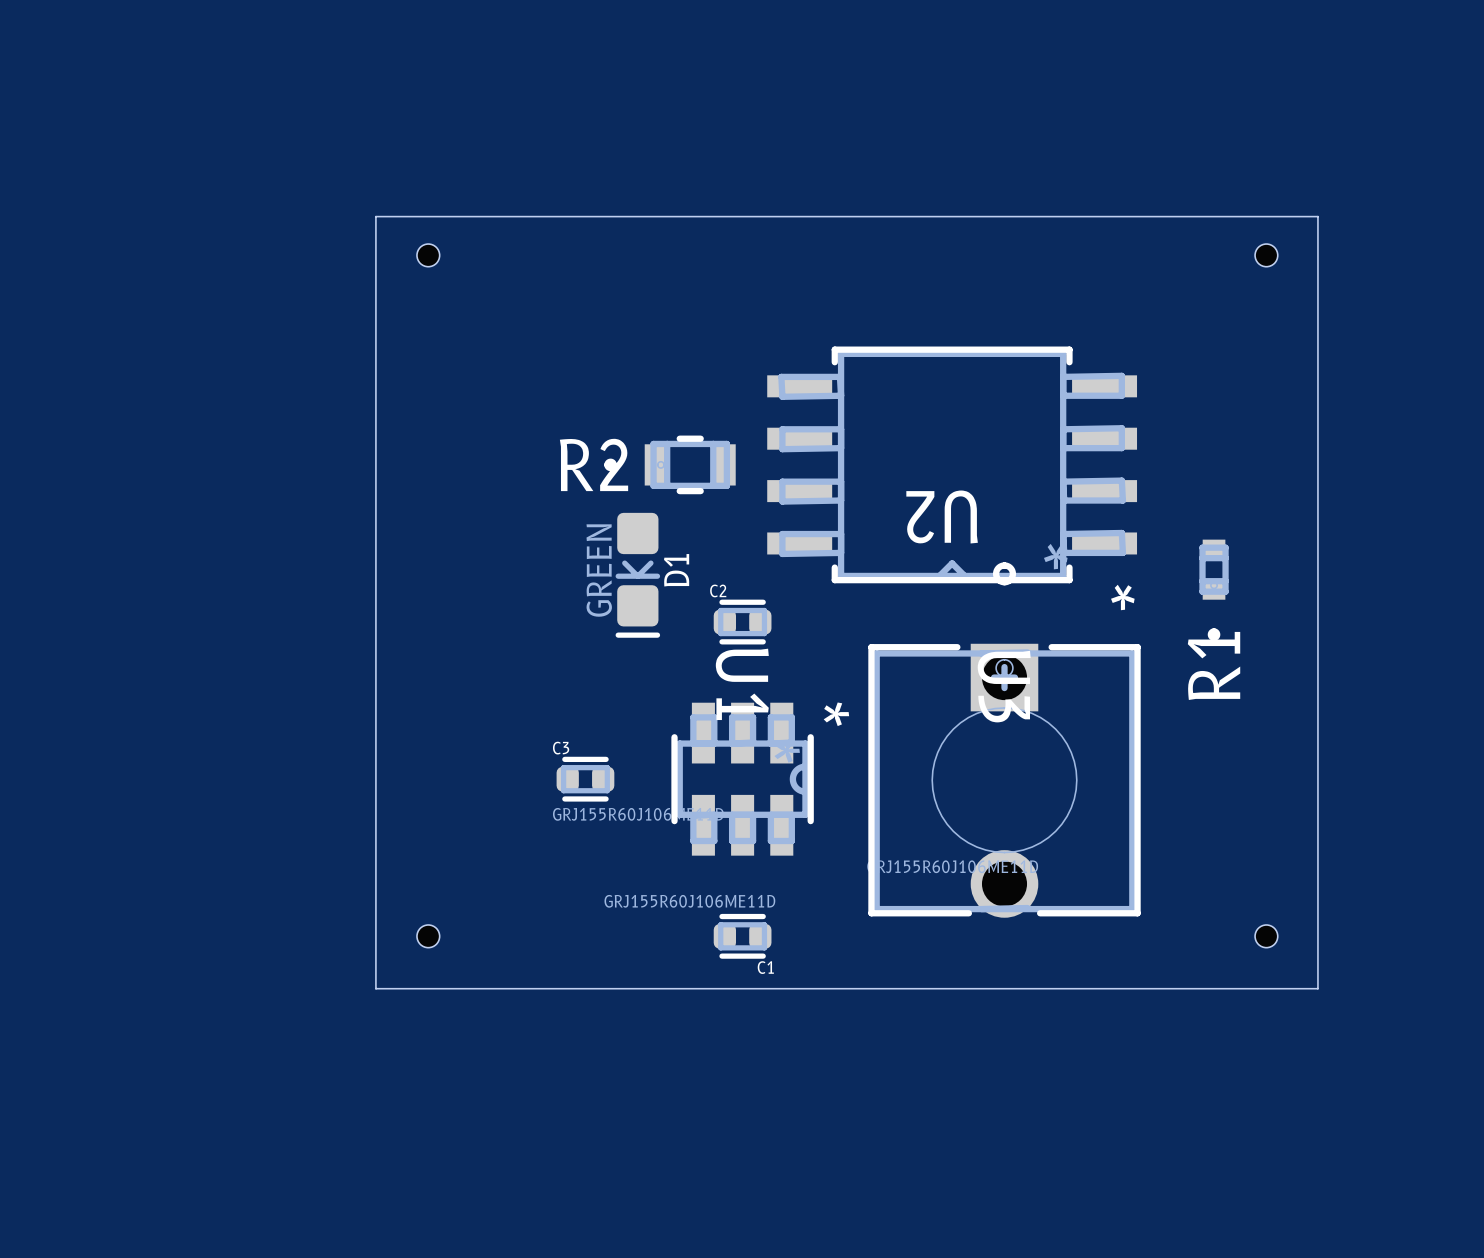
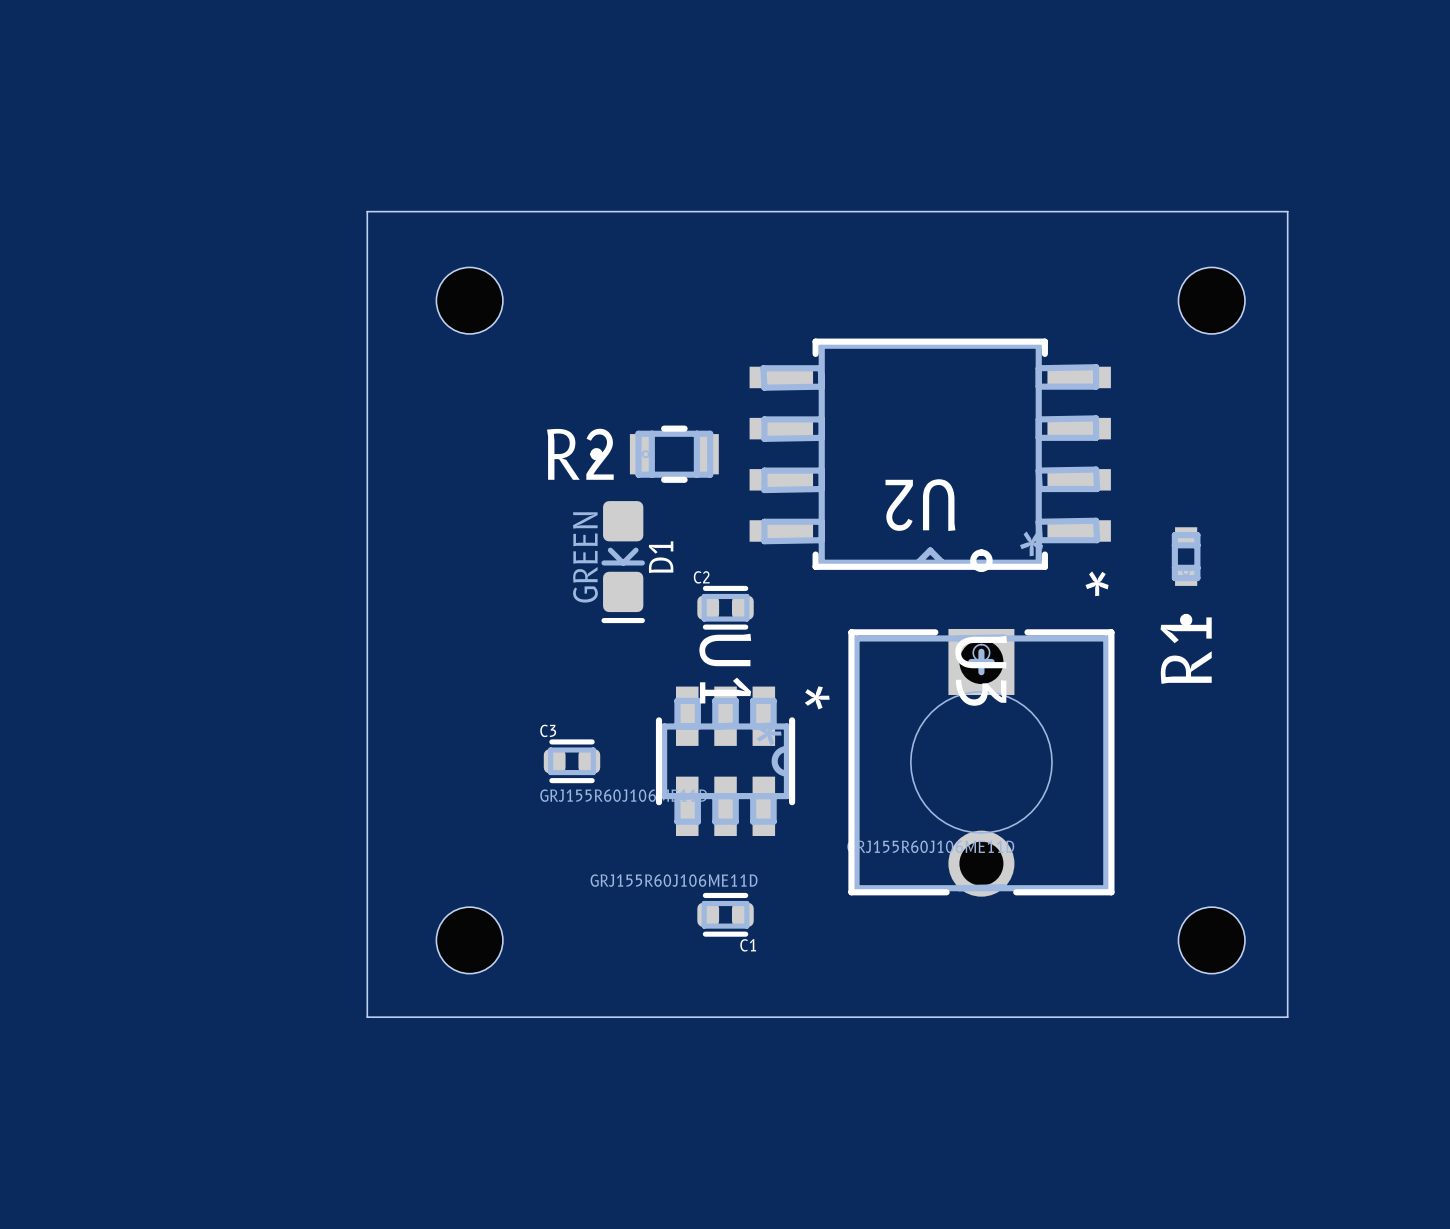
hole: (428, 255) -> none
hole: (1266, 255) -> none
hole: none -> (469, 300)
hole: none -> (1211, 300)
hole size: [1255, 924, 1278, 948] -> [1178, 907, 1245, 974]
hole: (428, 936) -> none
hole: none -> (469, 940)
board edge: (375, 988) (1317, 988) -> (367, 965) (367, 1017) (1287, 1017) (1287, 965)

